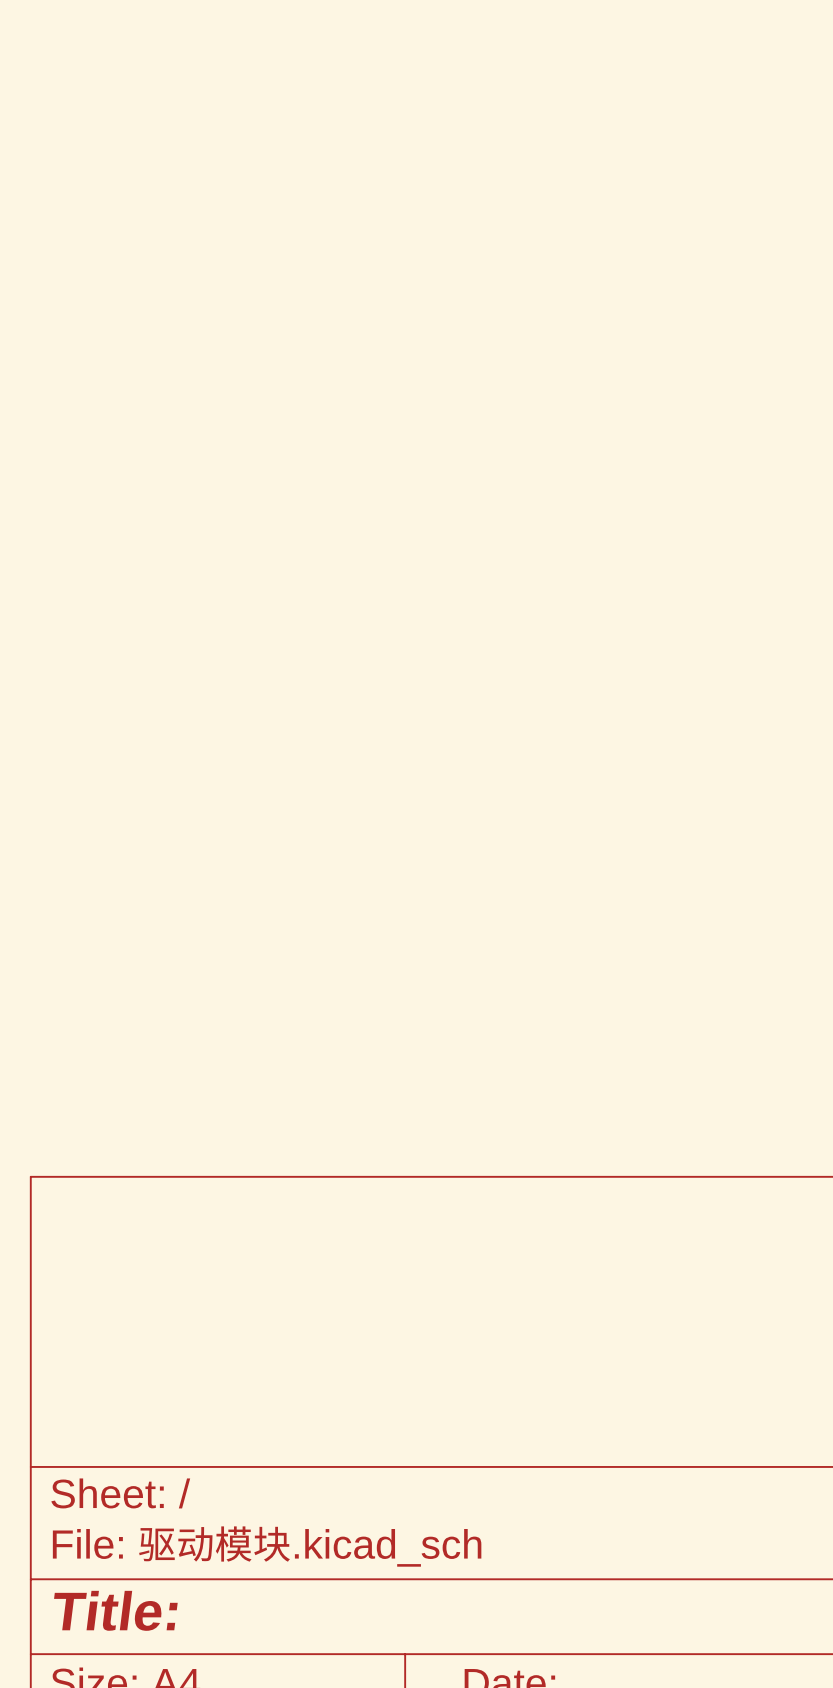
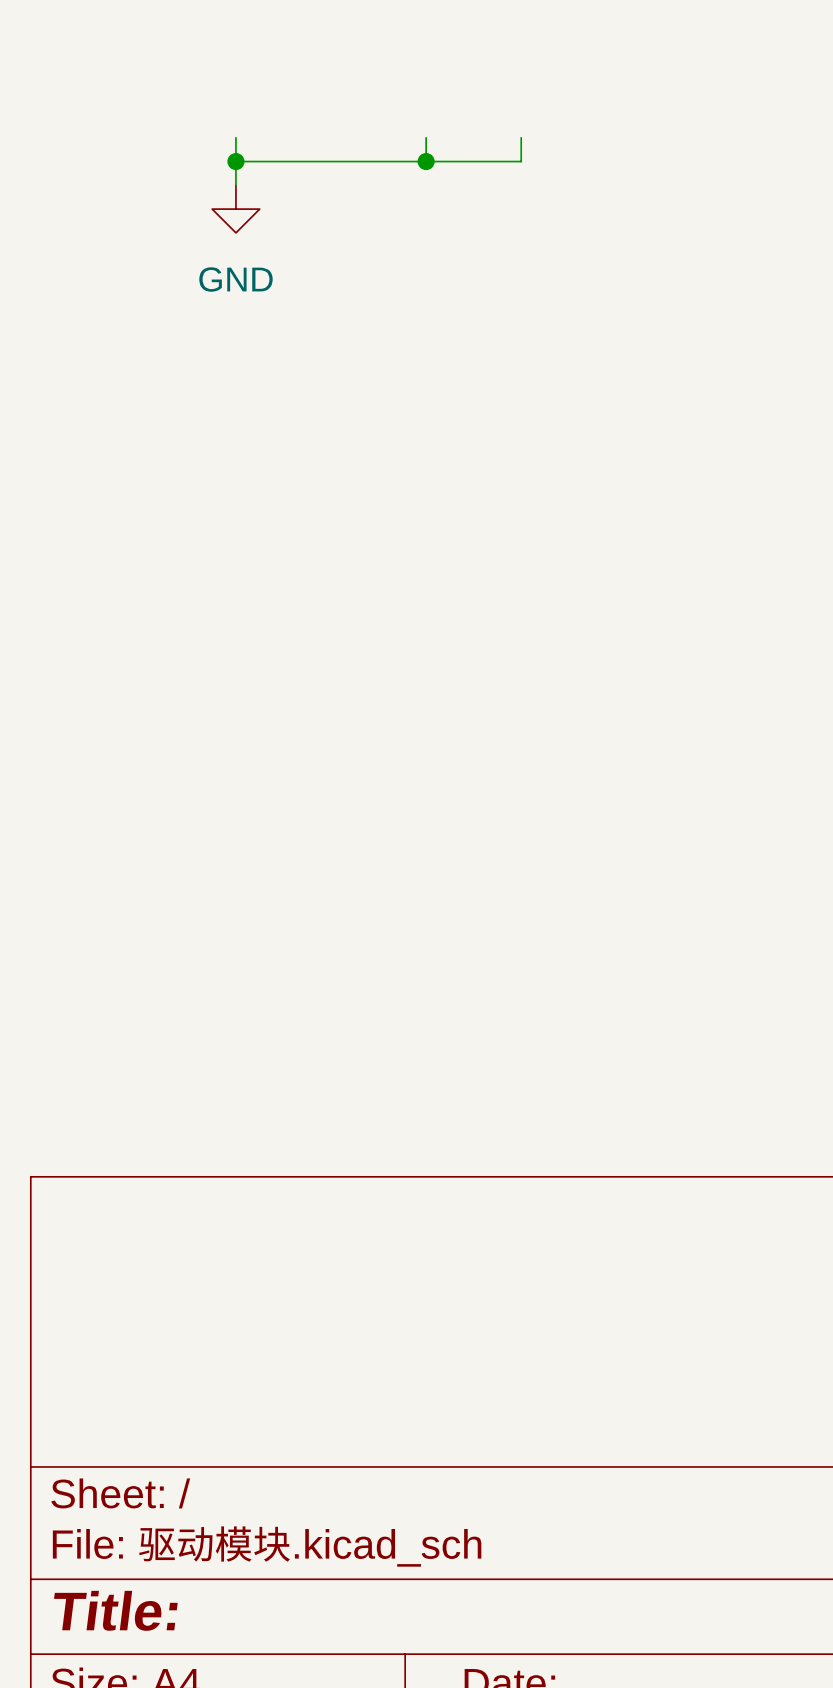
wire: none -> (235, 137) (235, 185)
wire: none -> (426, 137) (426, 161)
wire: none -> (521, 137) (521, 161) (235, 161)
junction: none -> (235, 161)
junction: none -> (426, 161)
power symbol: none -> GND (235, 209)

